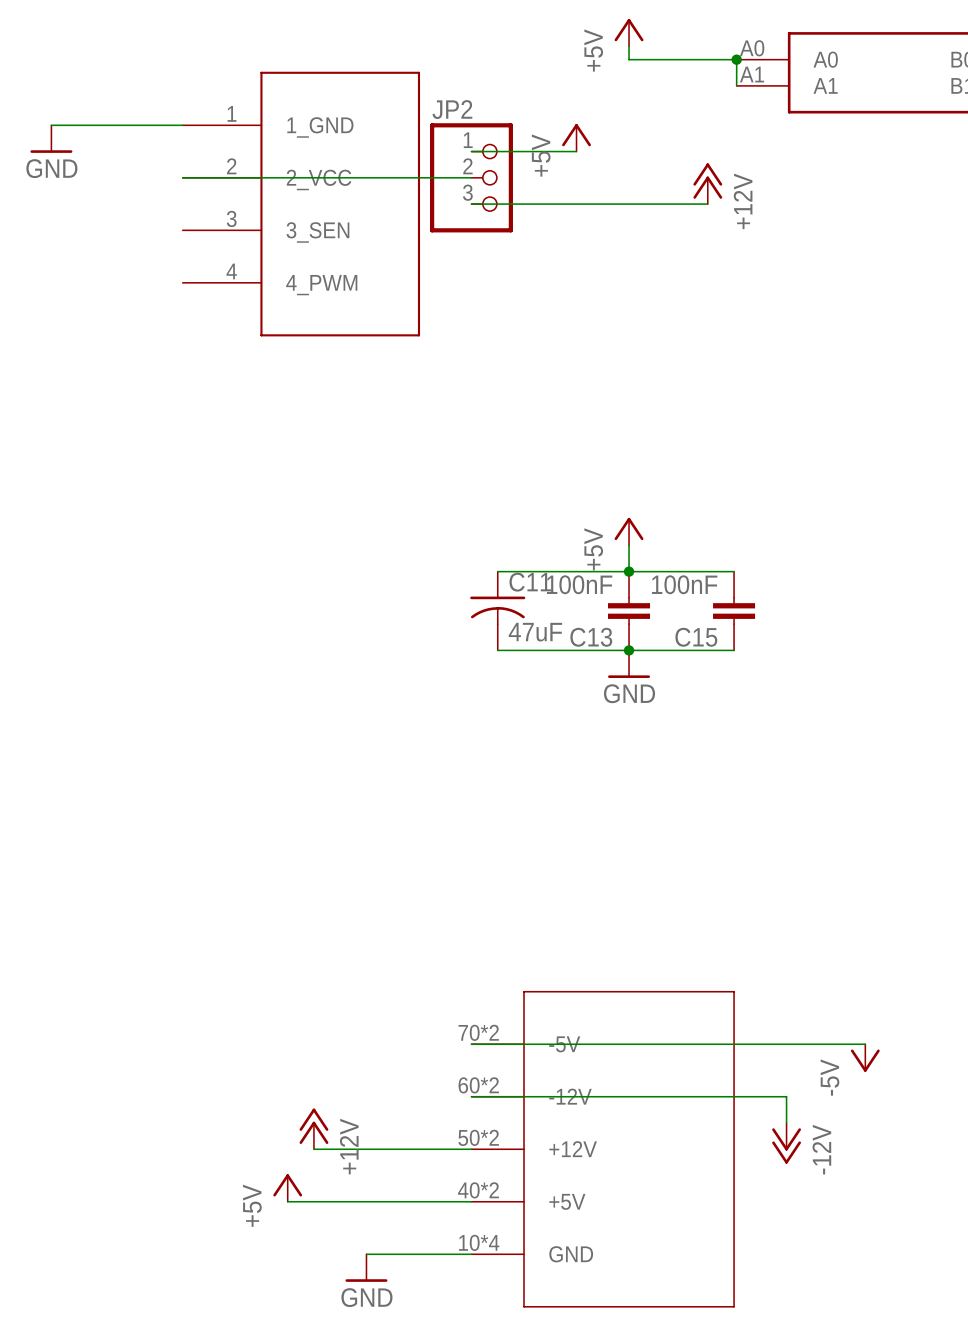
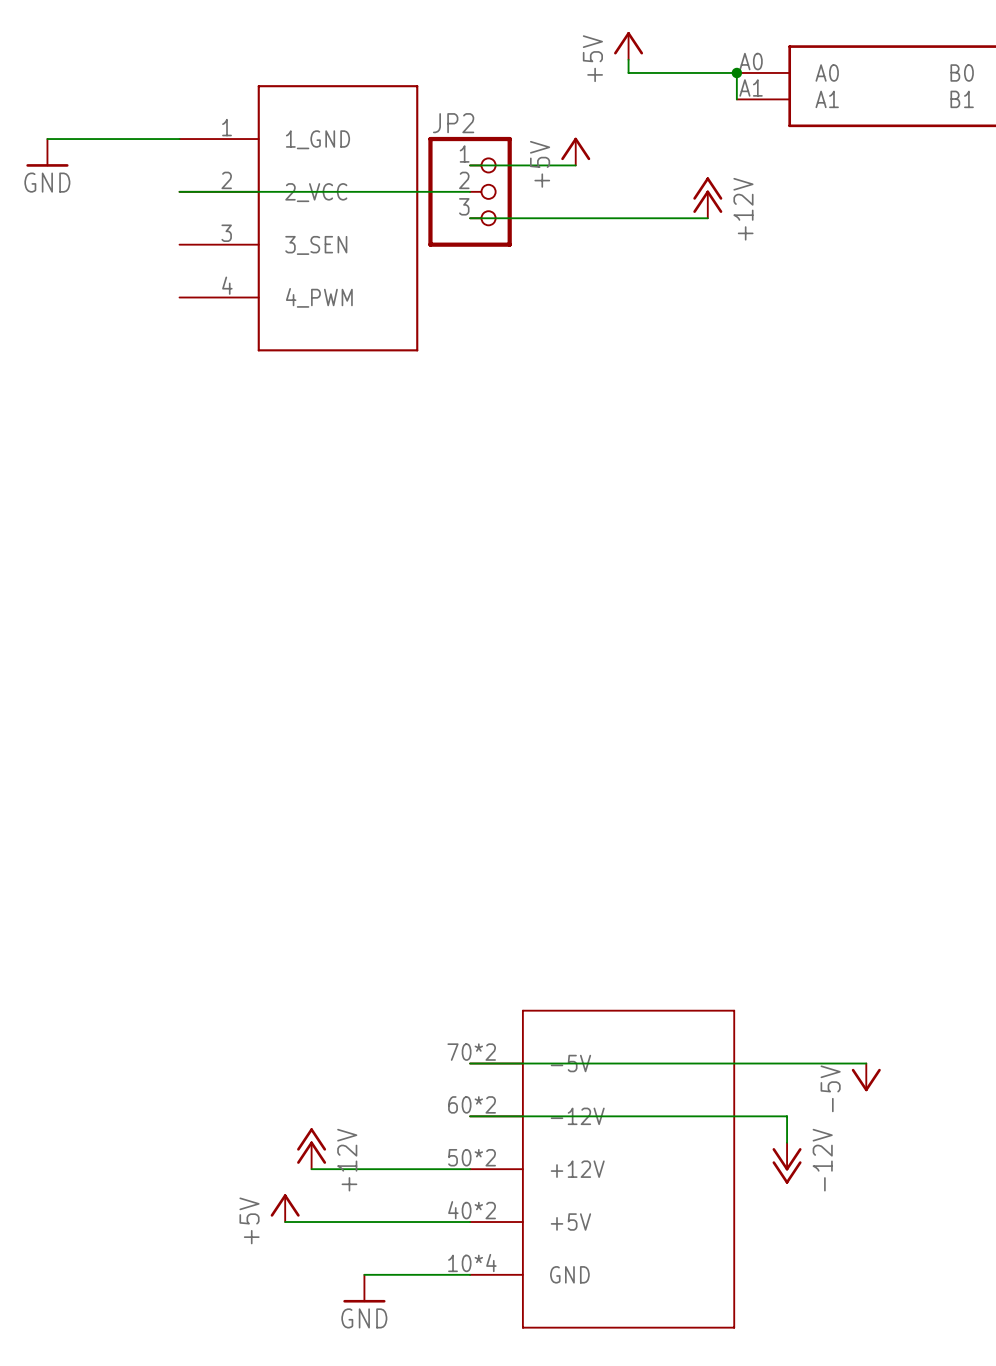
power symbol: +5V (629, 531) -> none
wire: (629, 545) (629, 571) -> none
wire: (497, 571) (734, 571) -> none
junction: (629, 571) -> none
C11: 47uF (497, 611) -> none
C13: 100nF (629, 611) -> none
C15: 100nF (734, 611) -> none
wire: (497, 650) (734, 650) -> none
junction: (629, 650) -> none
power symbol: GND (629, 664) -> none

